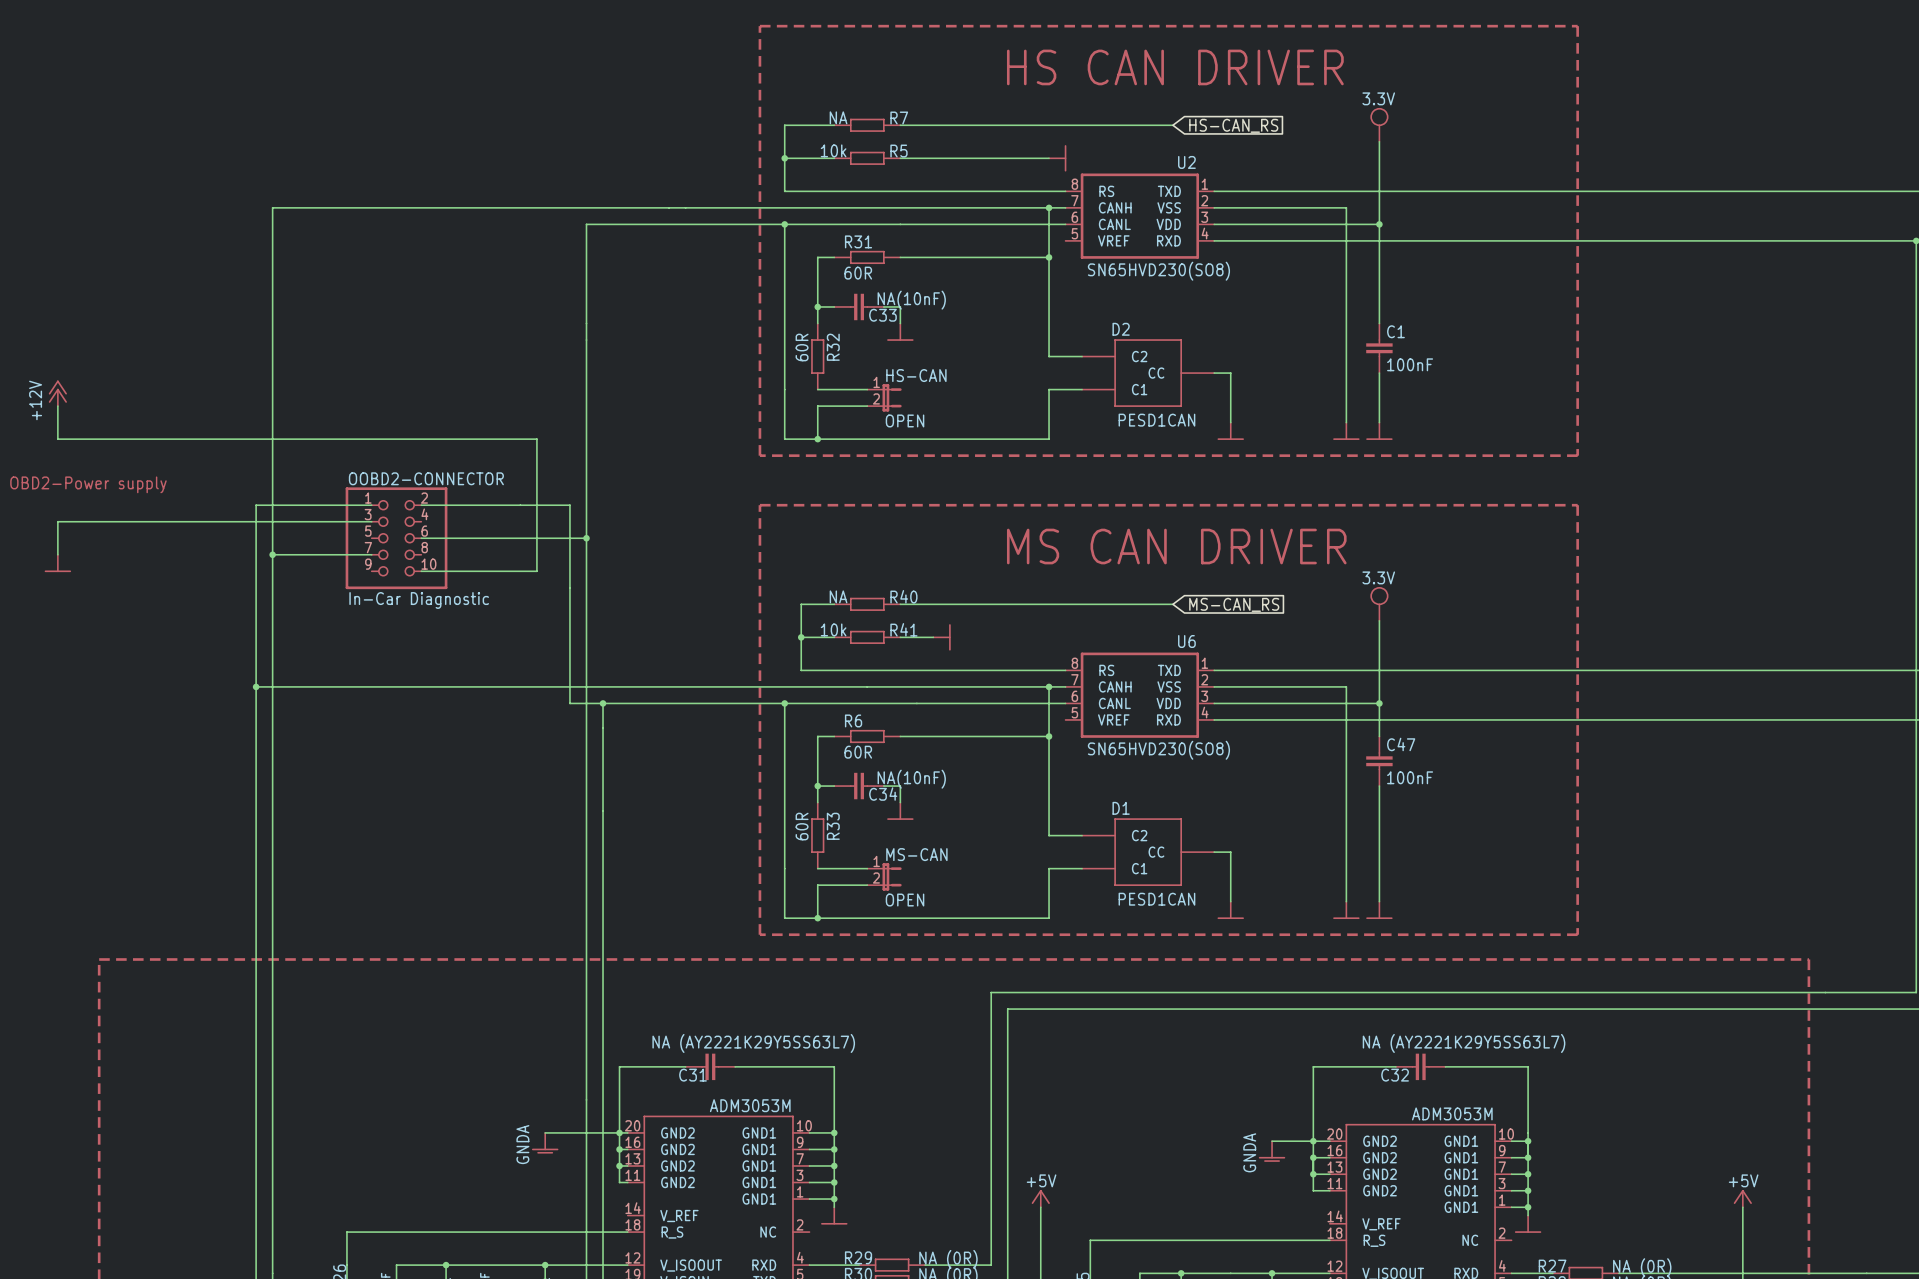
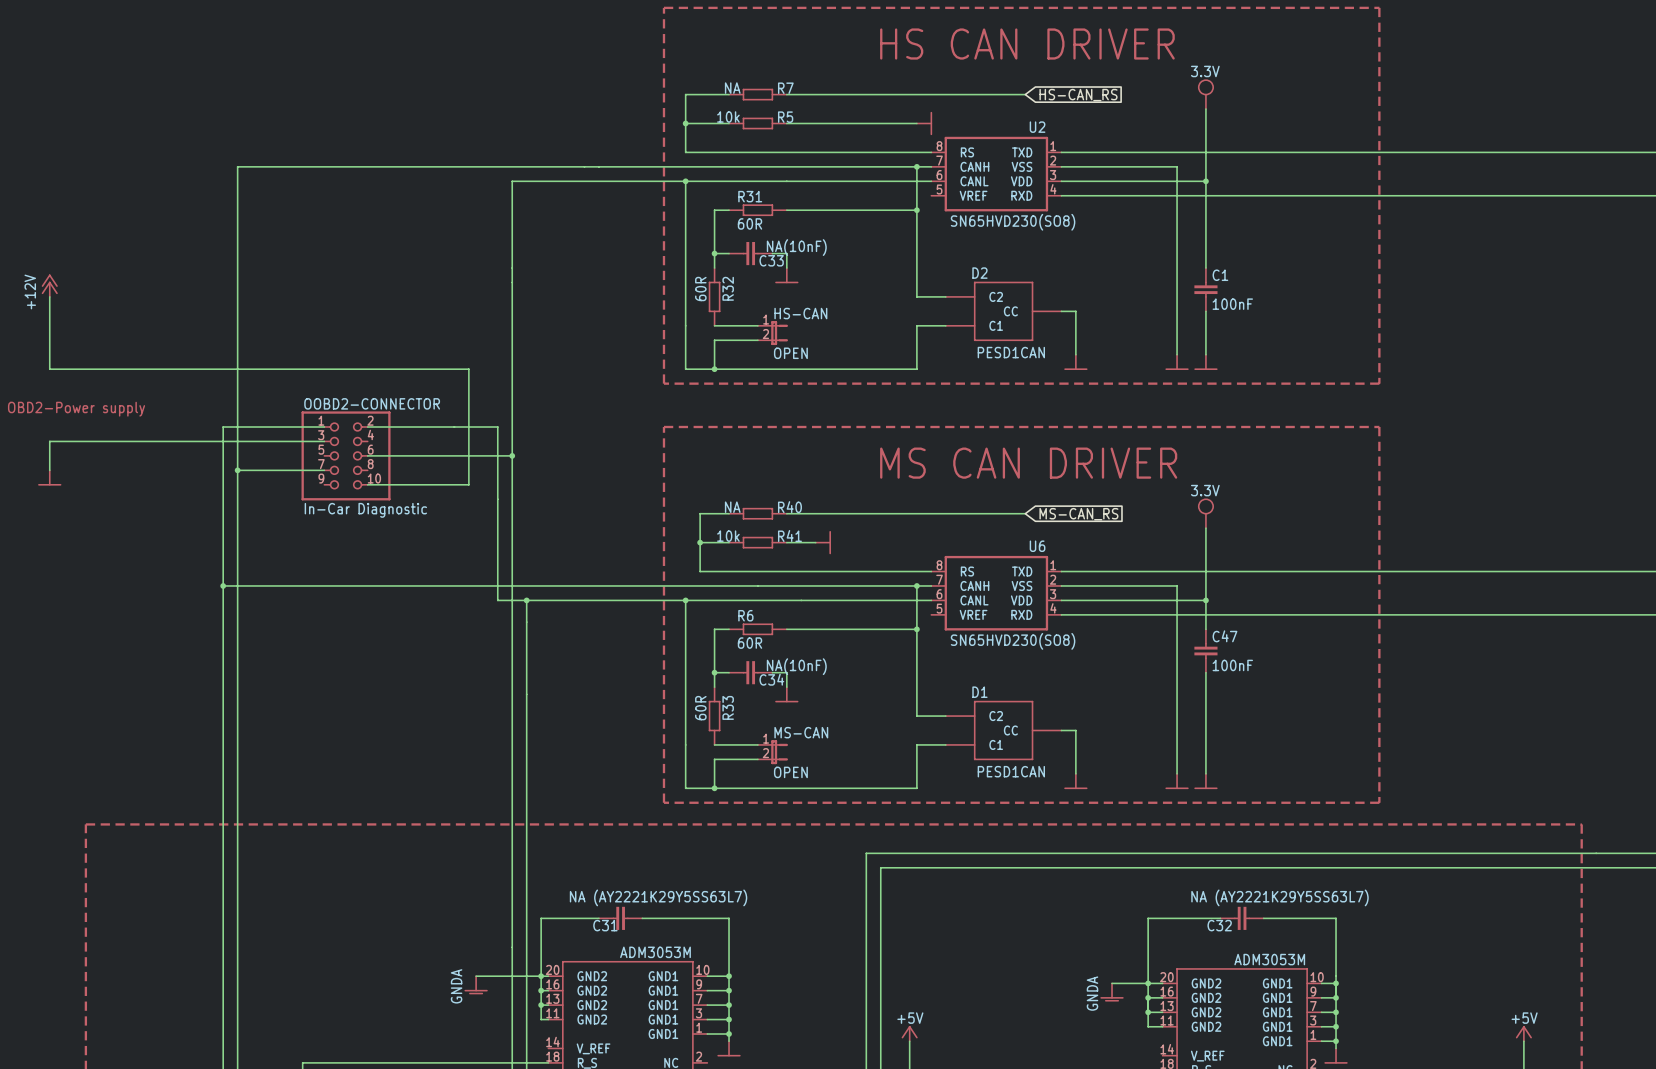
wire: none -> (49, 296) (49, 340)
power symbol position: +12V (57, 393) -> +12V (49, 285)

